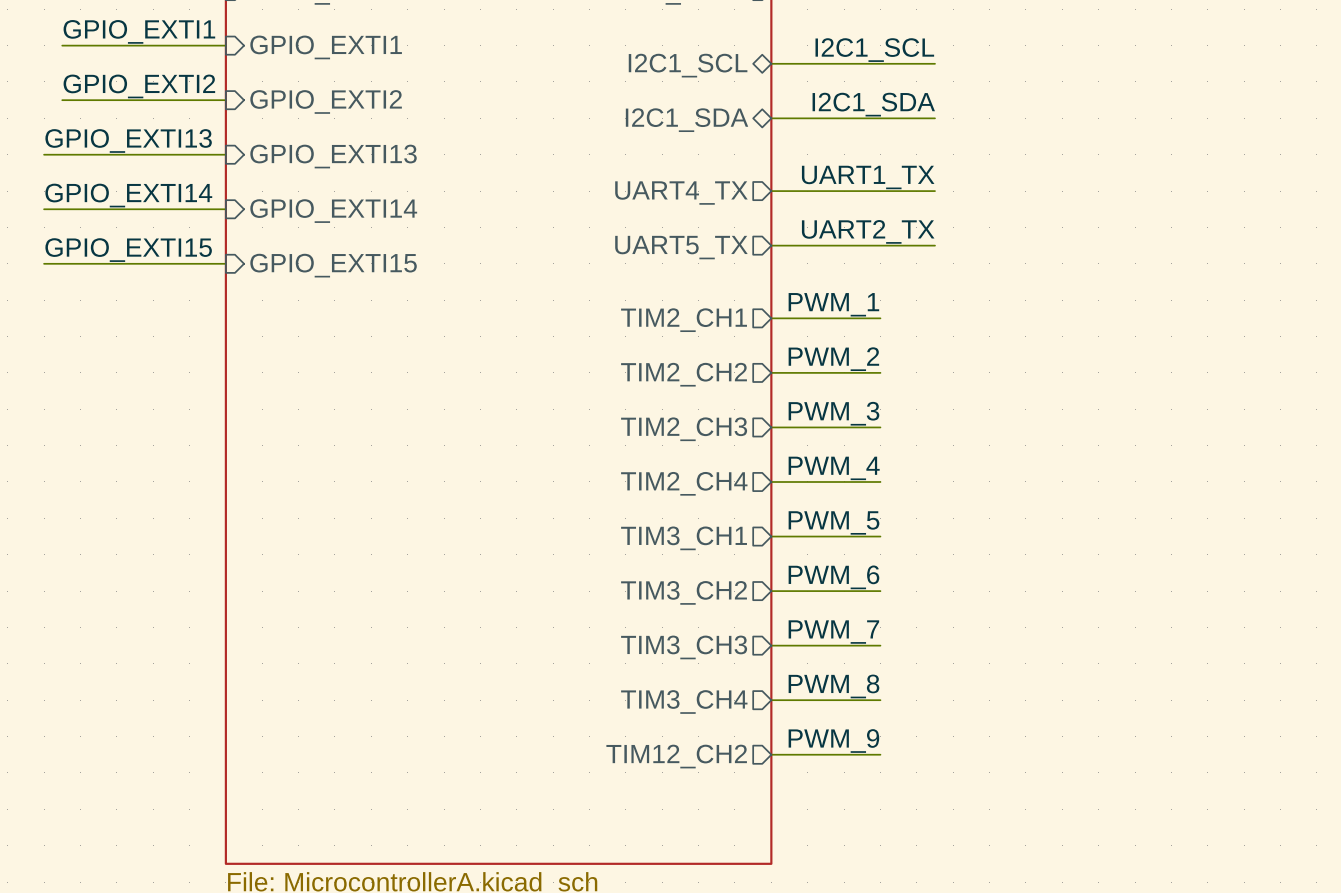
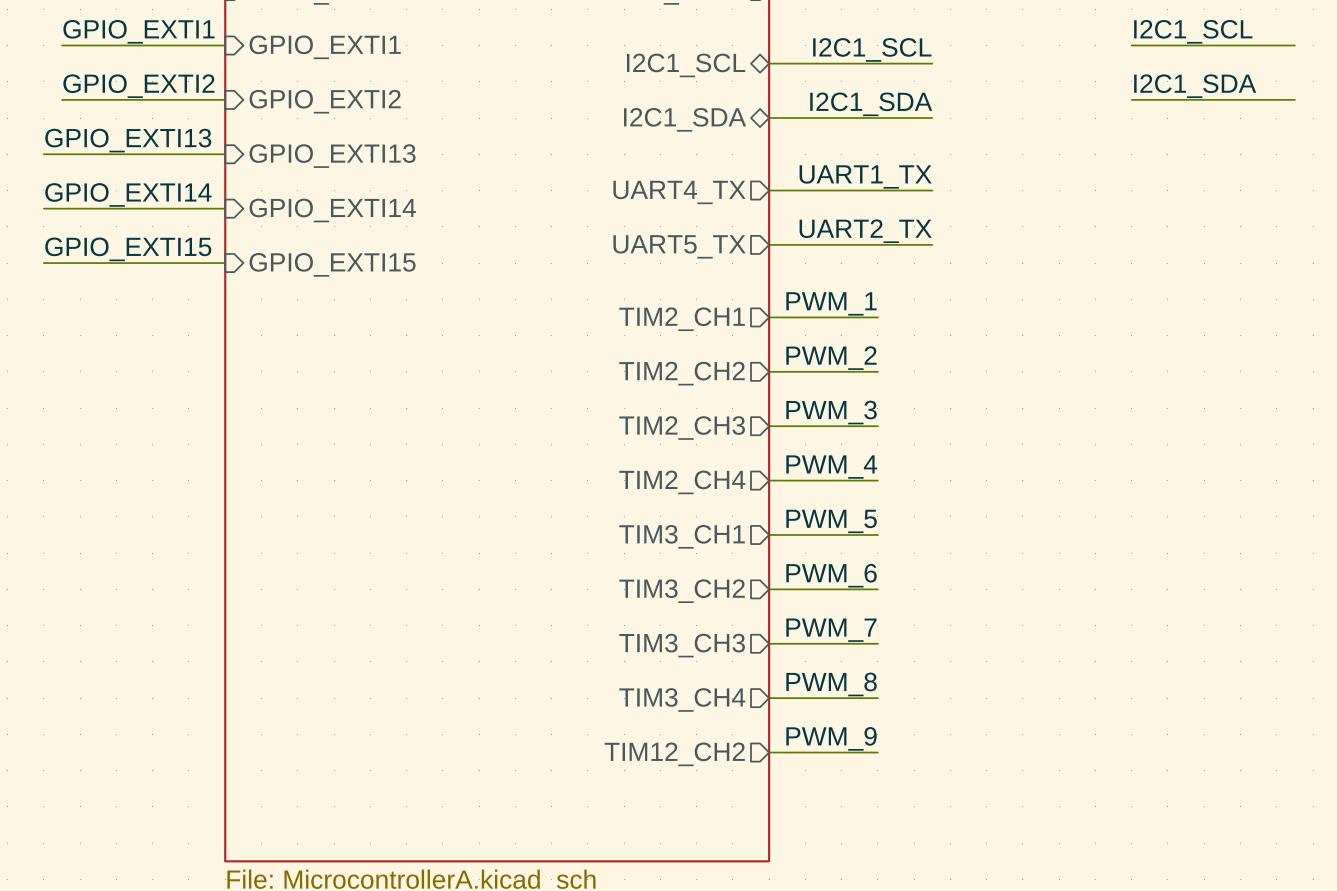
label: none -> I2C1_SCL (1193, 31)
wire: none -> (1131, 45) (1294, 45)
label: none -> I2C1_SDA (1195, 86)
wire: none -> (1131, 99) (1294, 99)

